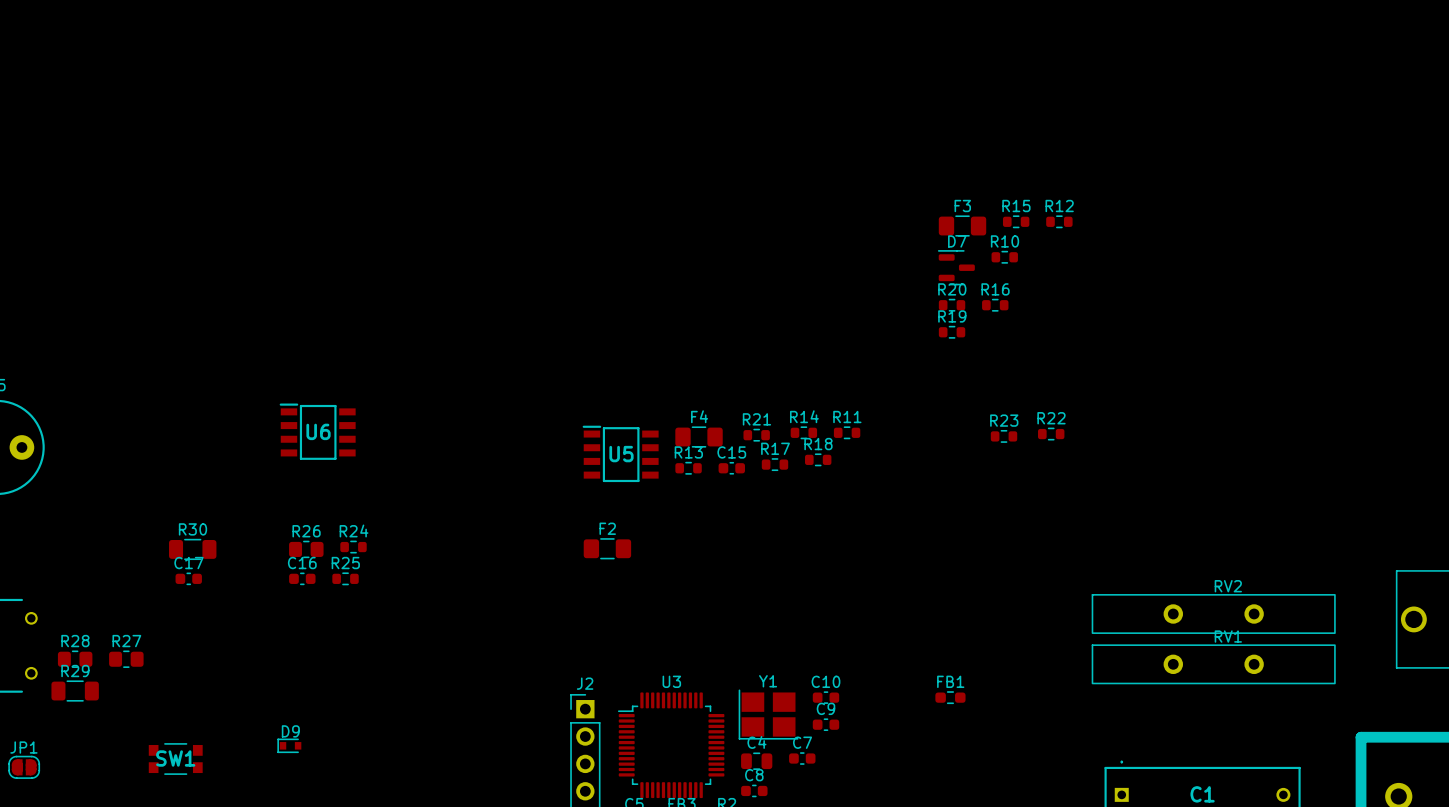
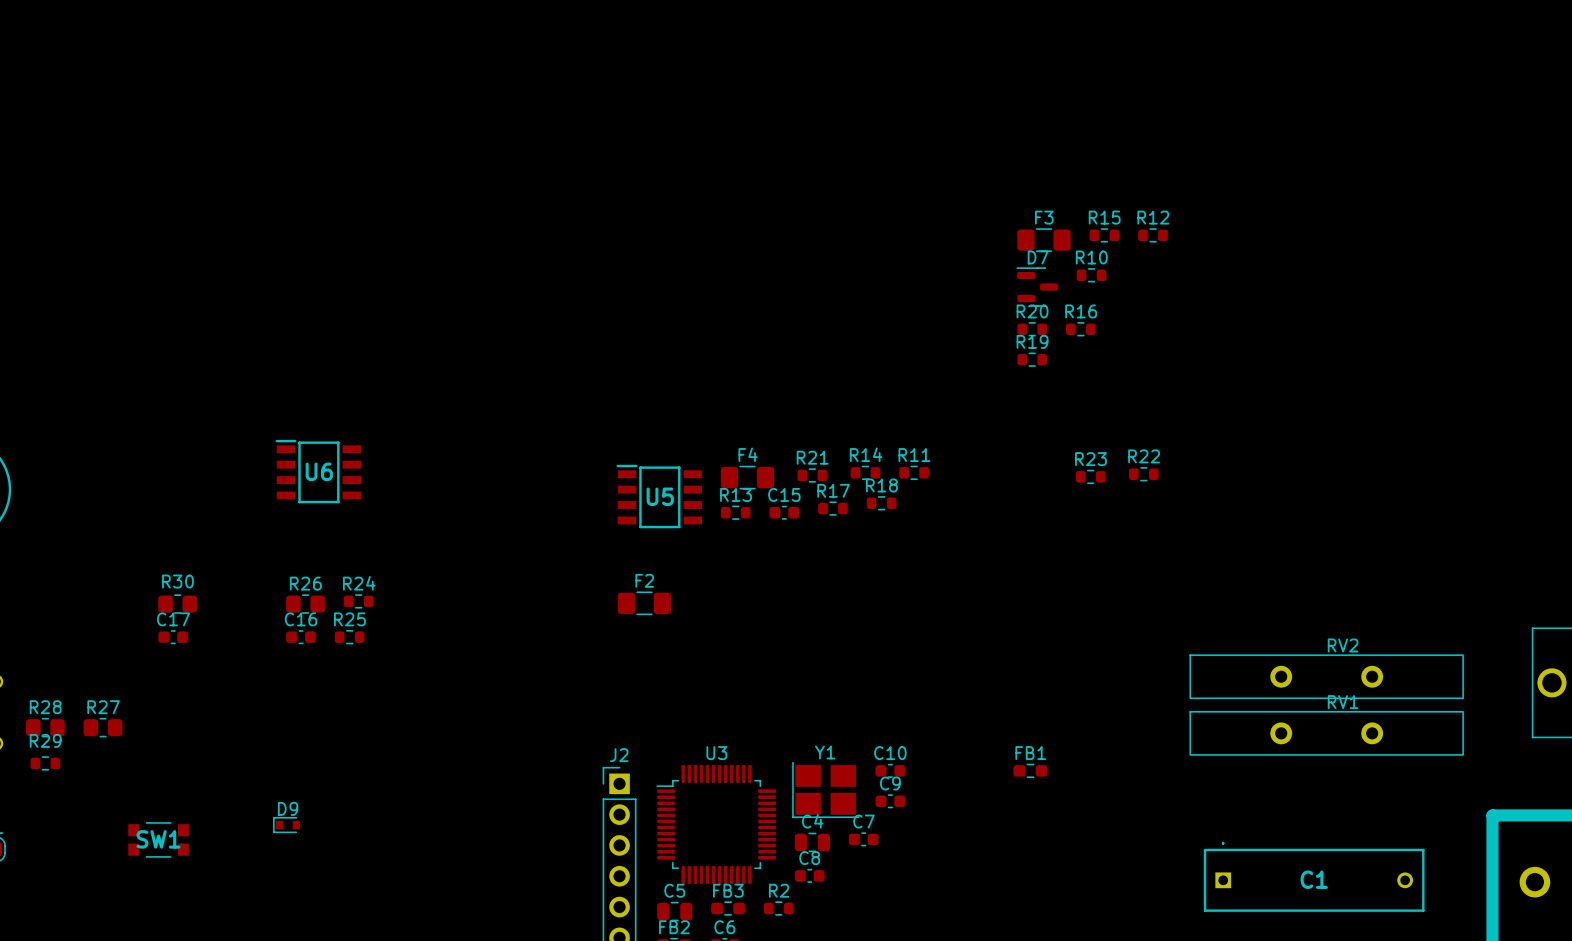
R30 footprint: [169, 538, 217, 560] -> [158, 594, 198, 614]
R29 footprint: [51, 680, 99, 702] -> [30, 756, 61, 771]

